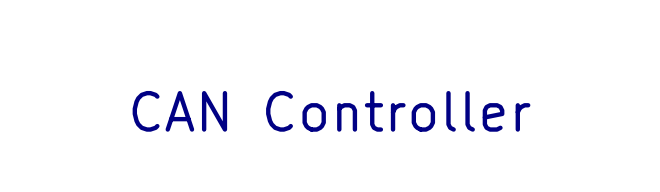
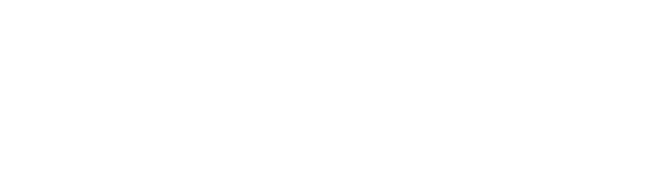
text: CAN Controller (331, 111) -> none

